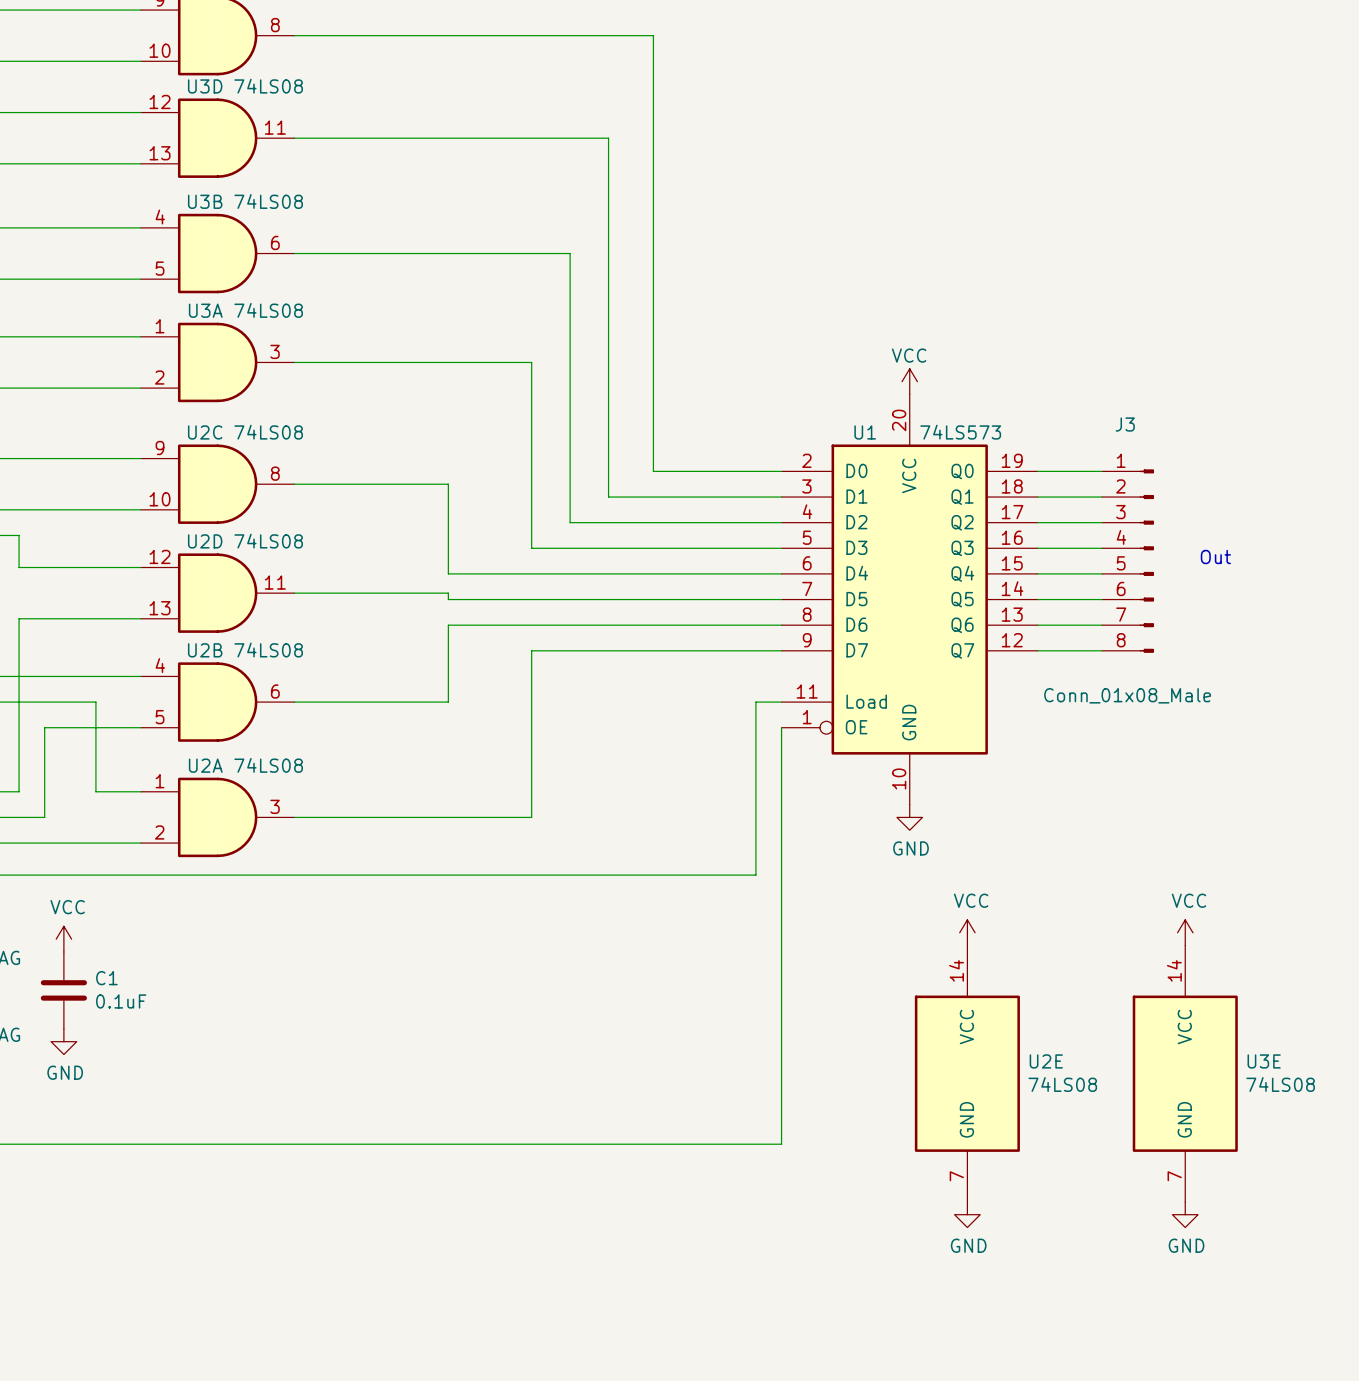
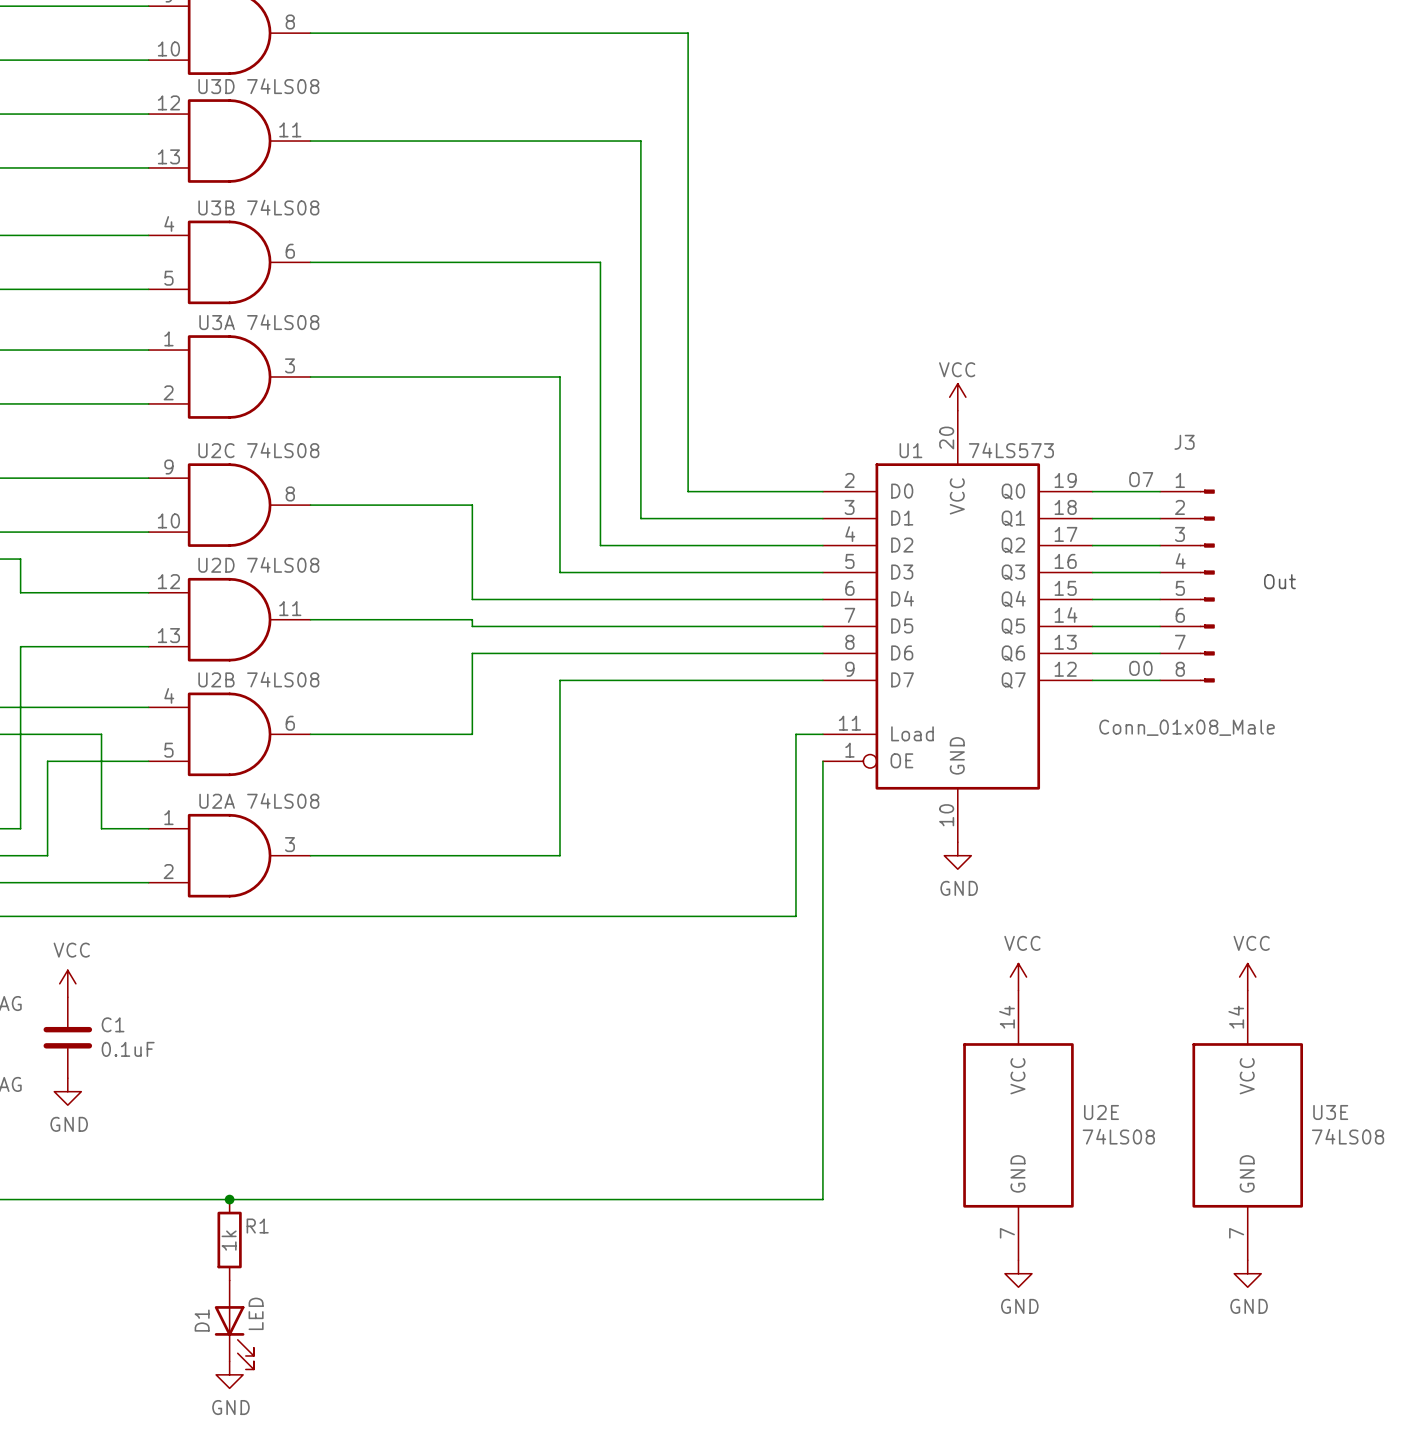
label: none -> O7 (1141, 479)
label: none -> O0 (1140, 668)
junction: none -> (229, 1199)
R1: none -> 1k (229, 1240)
D1: none -> LED (234, 1324)
power symbol: none -> GND (229, 1374)

